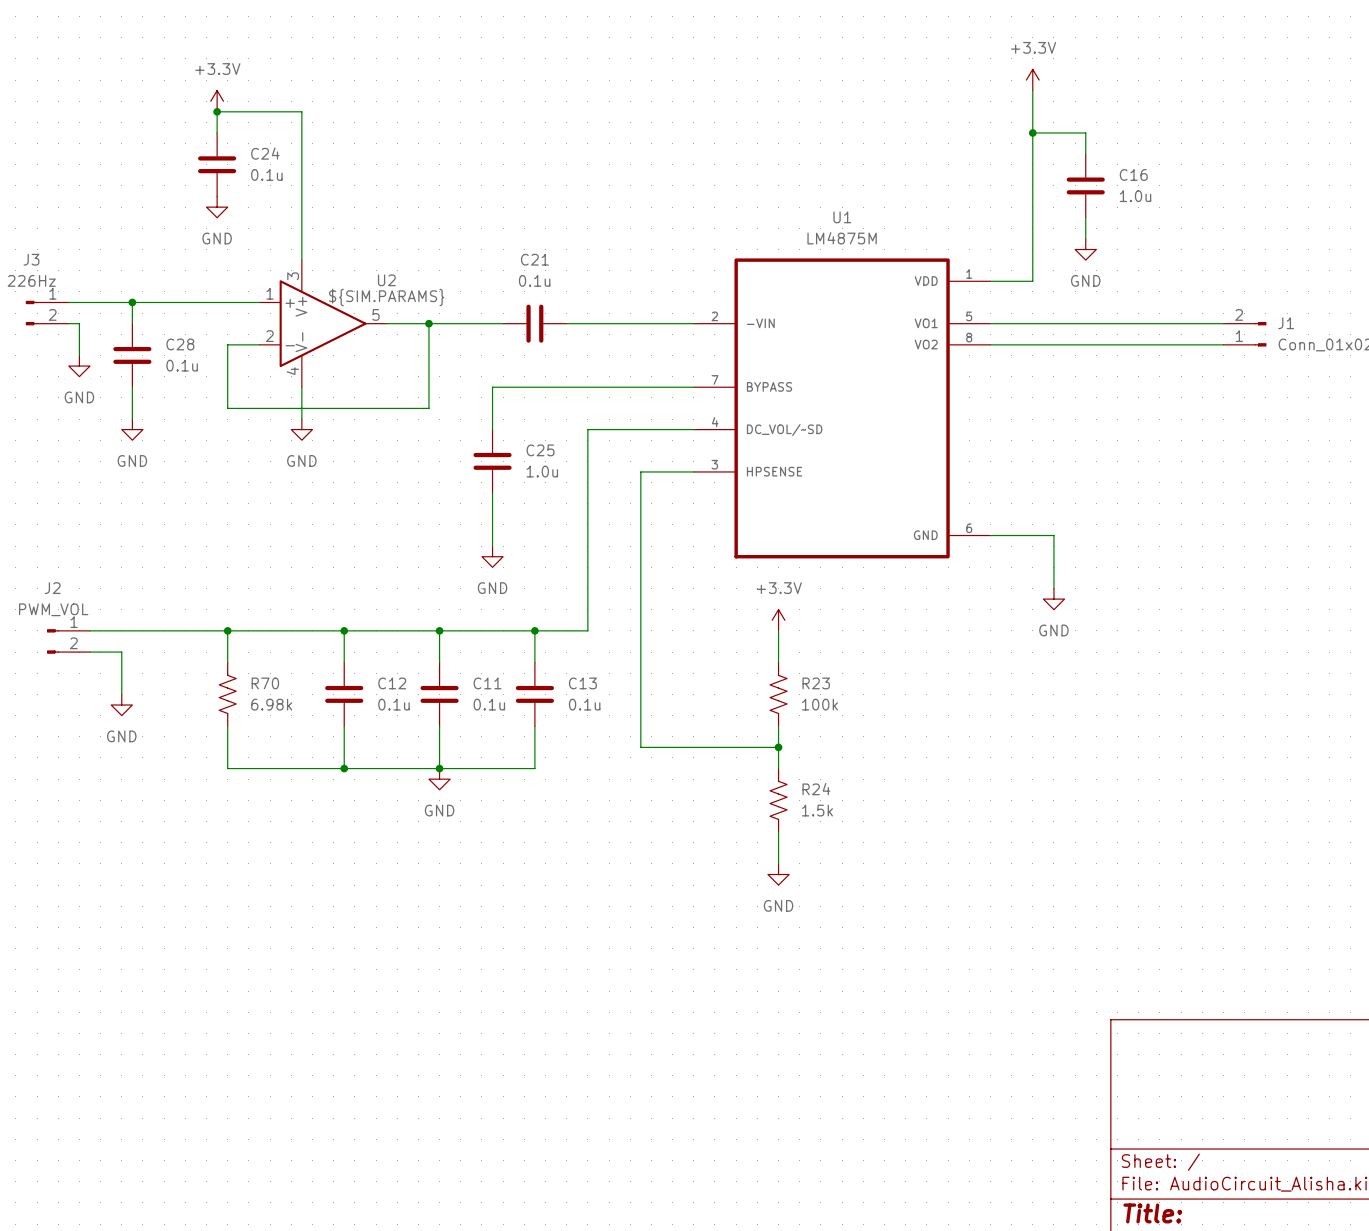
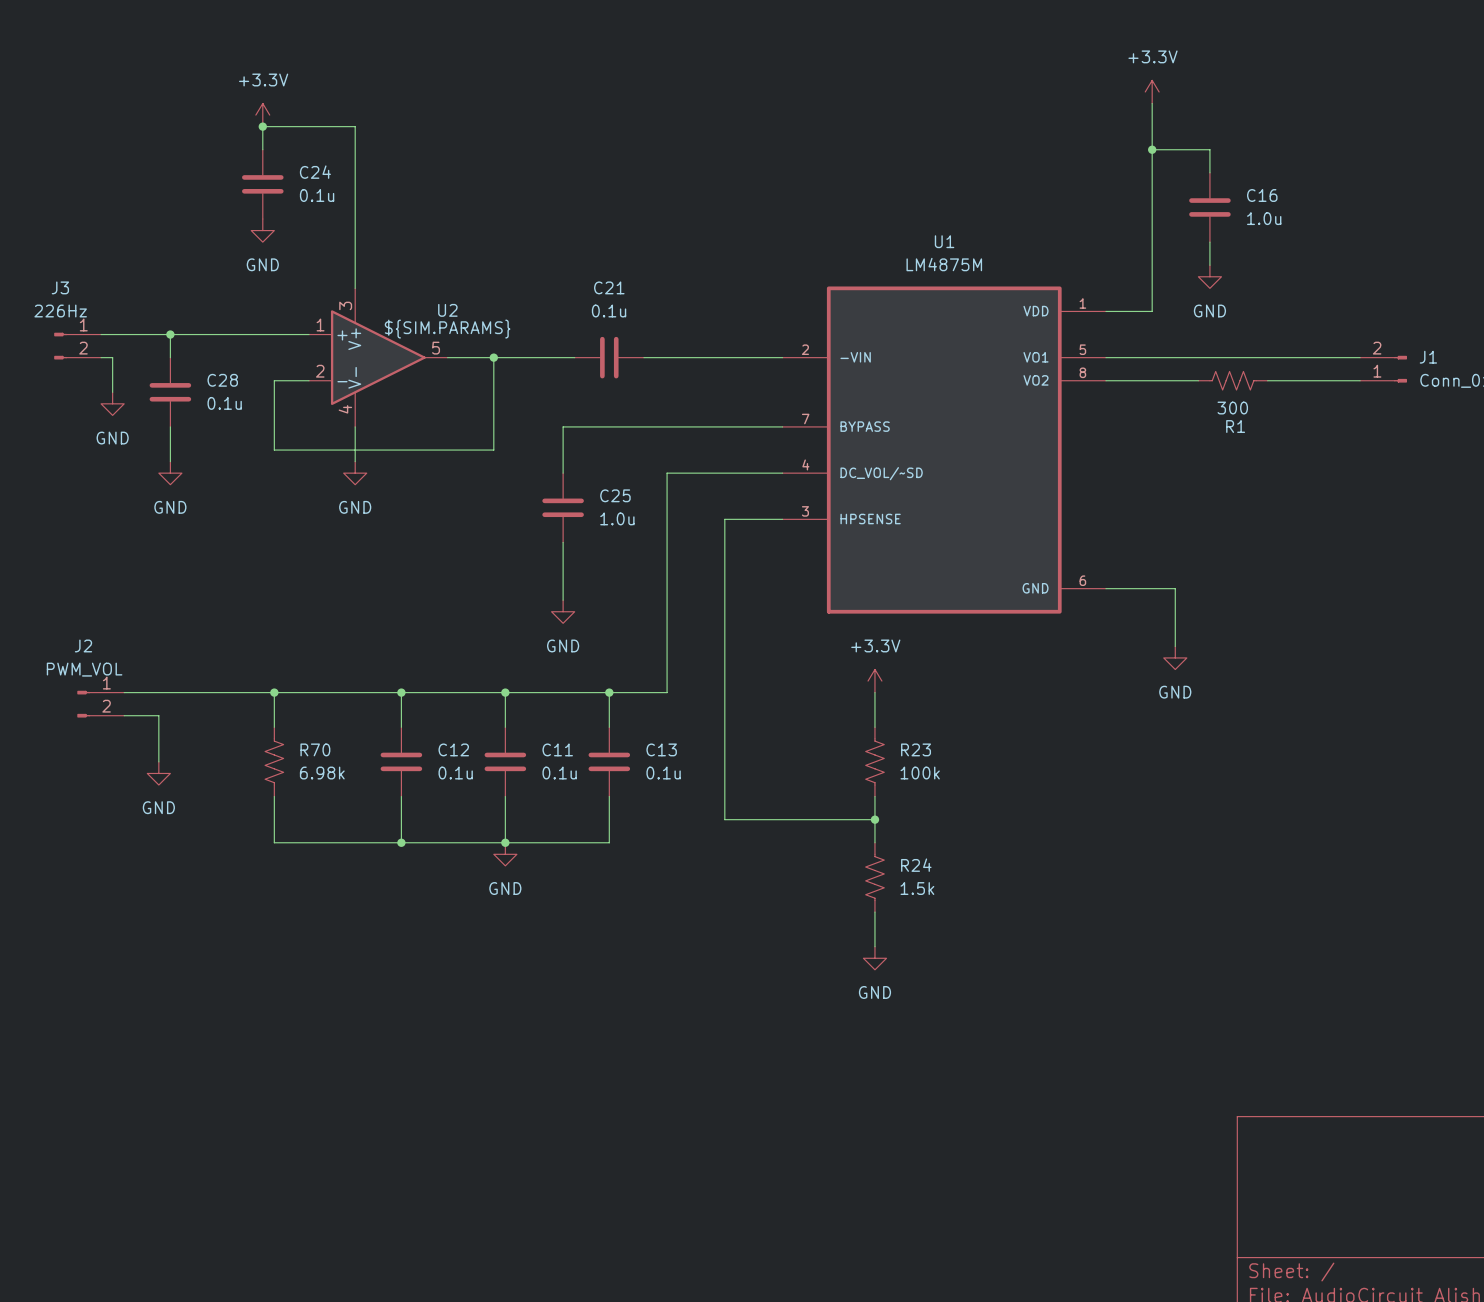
R1: none -> 300 (1233, 380)

